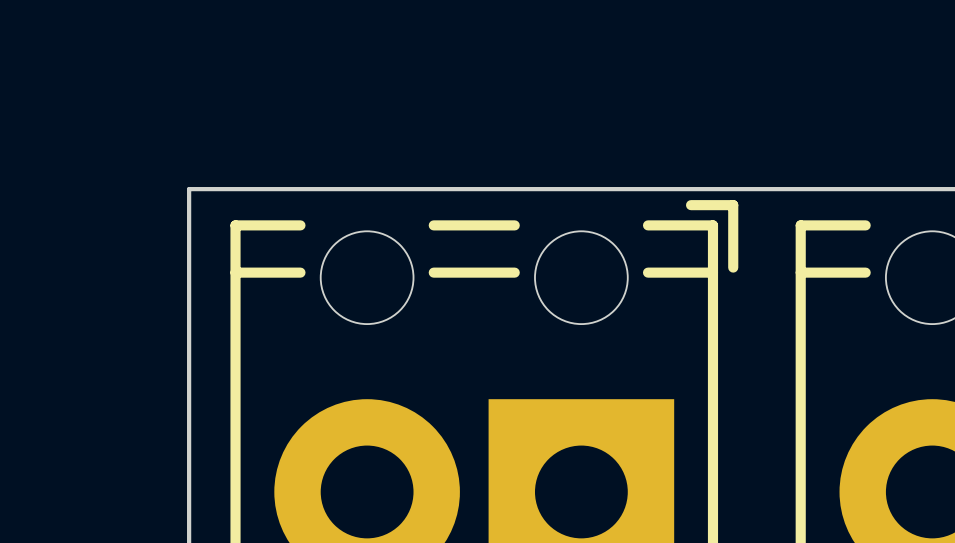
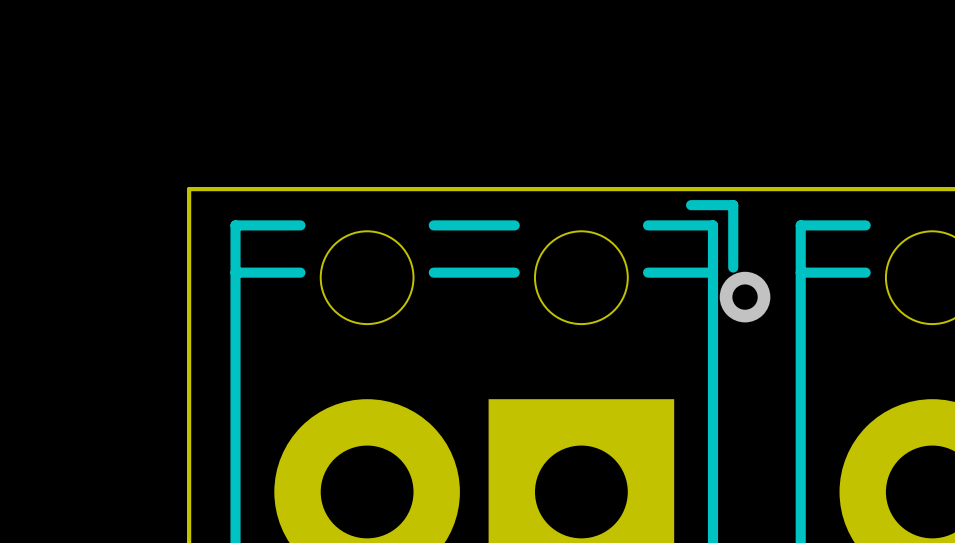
via: none -> (745, 297)

